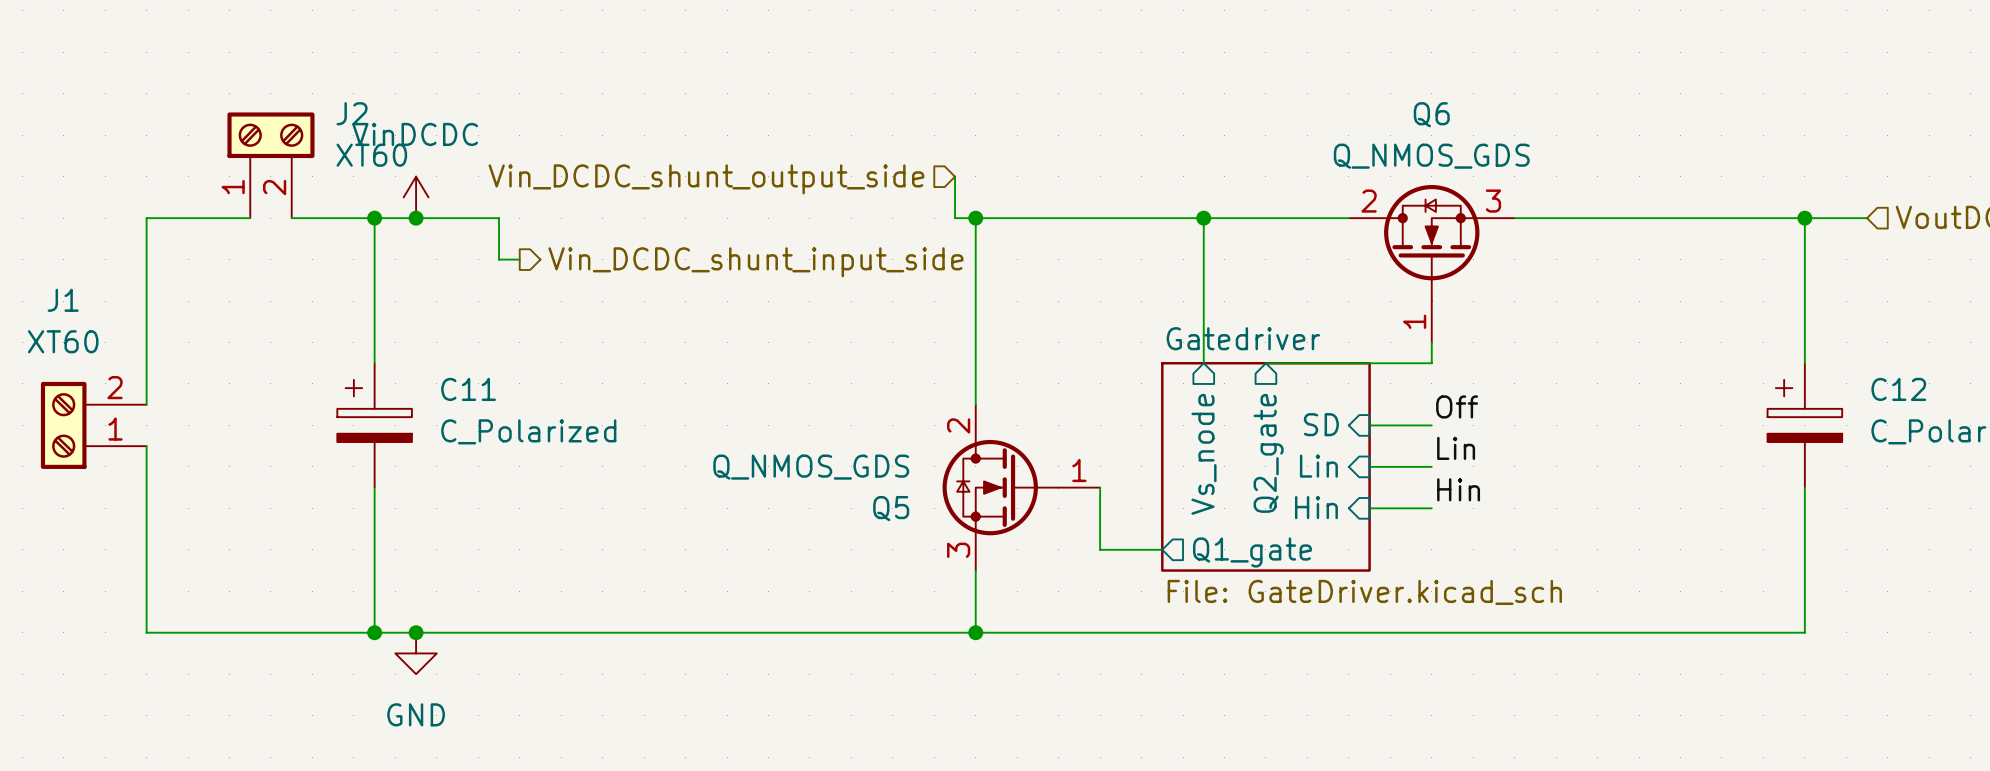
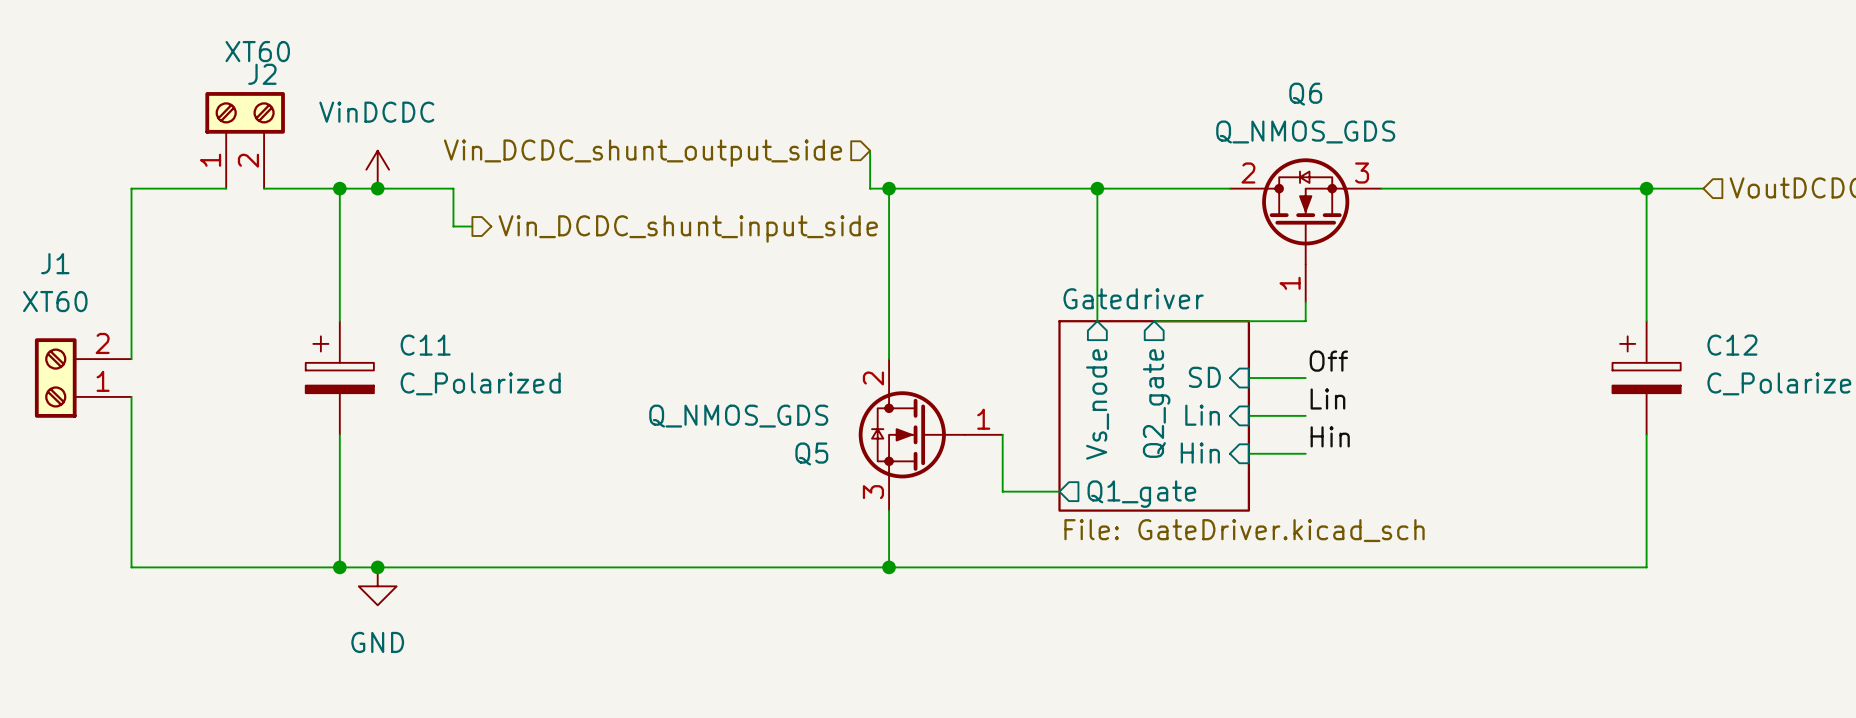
J2 name position: J2 (352, 113) -> J2 (262, 74)
J2 value position: XT60 (371, 155) -> XT60 (257, 51)

